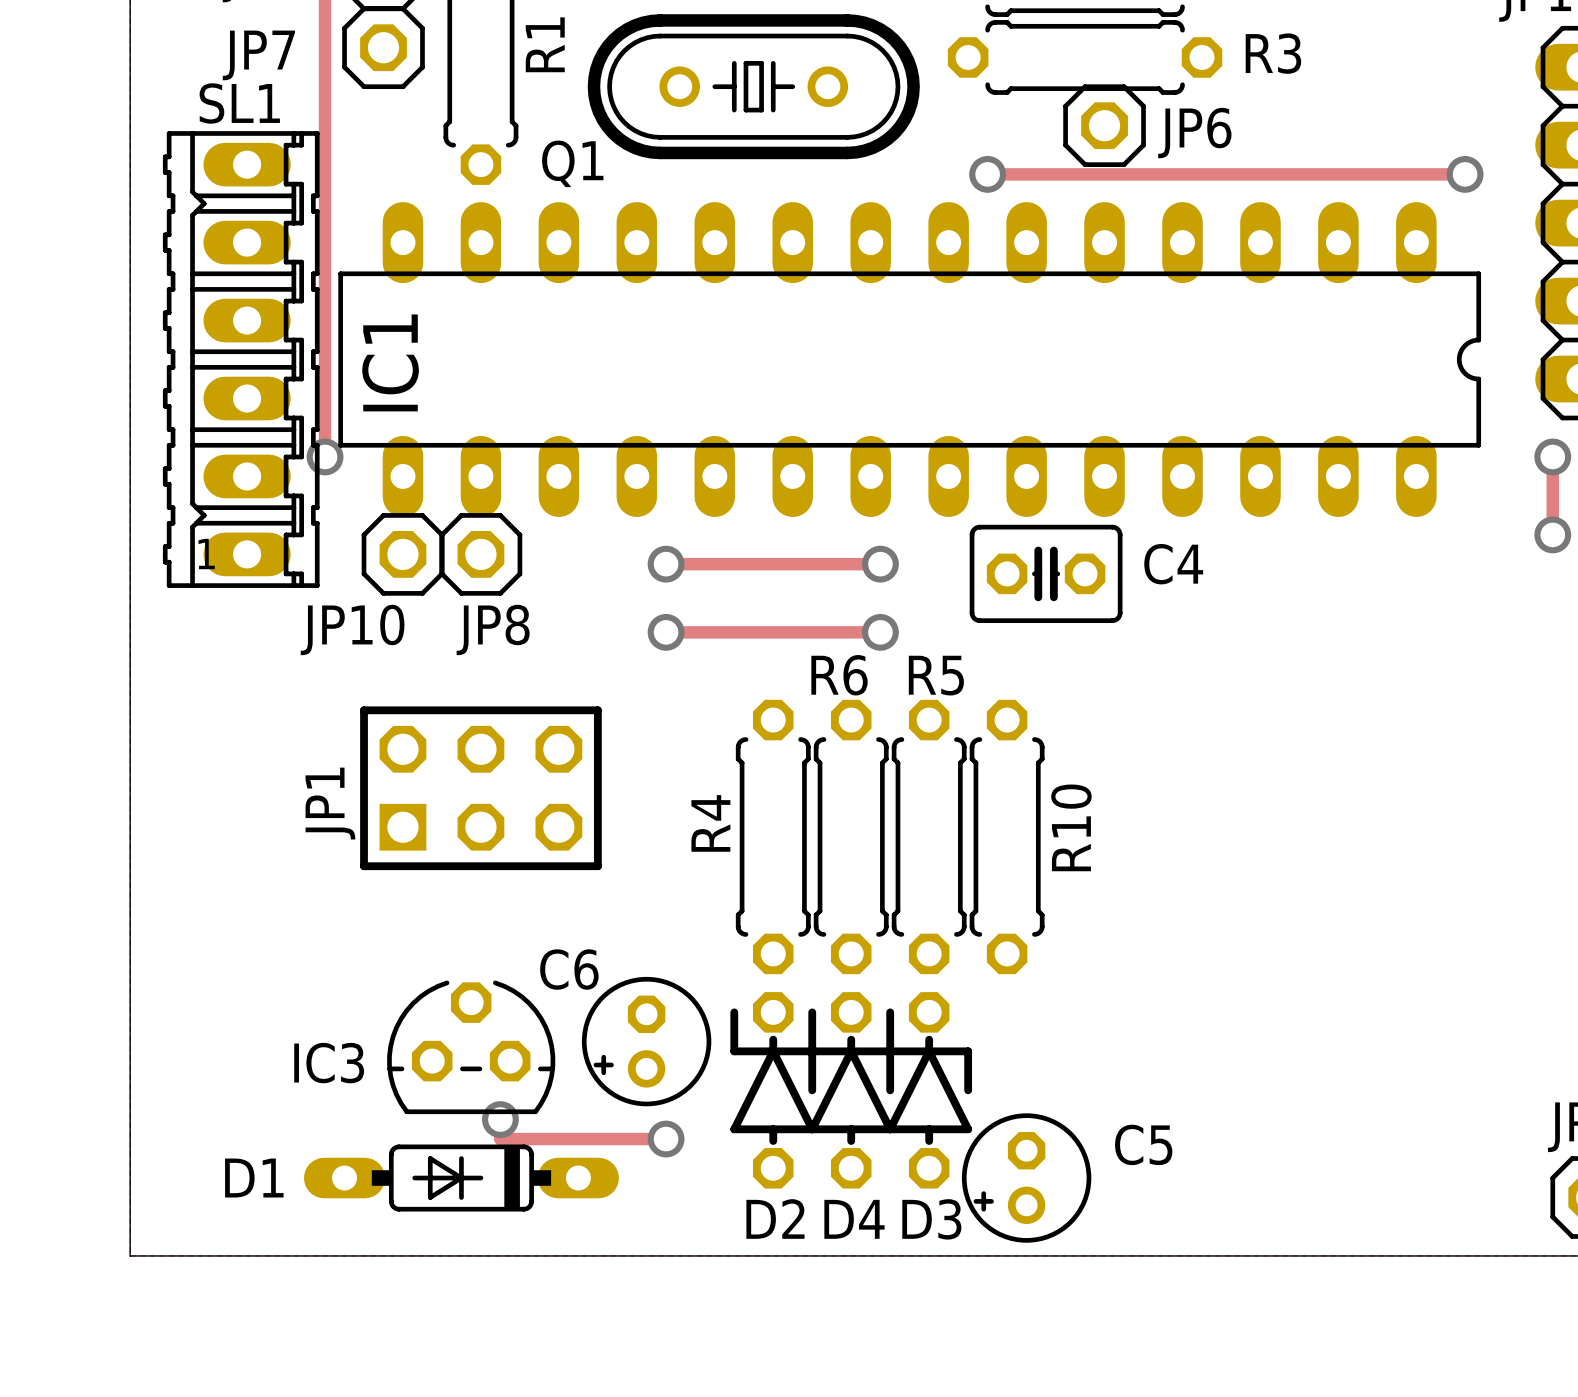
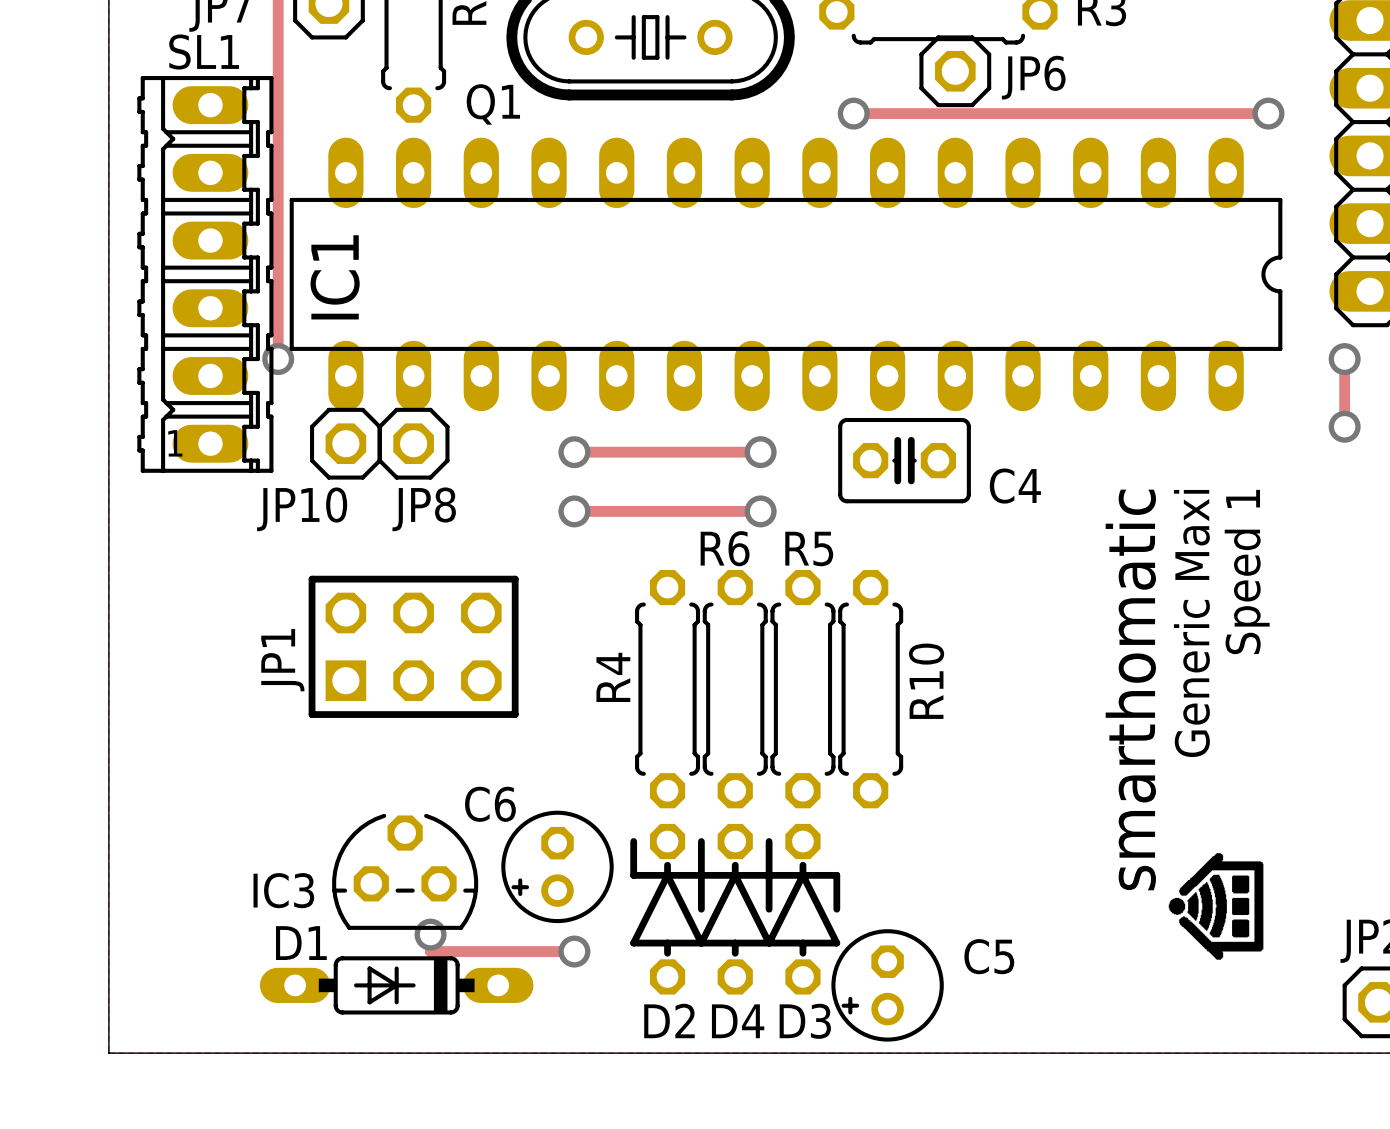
C4 name position: C4 (1173, 564) -> C4 (1015, 486)
text: none -> Speed 1 (1247, 572)
text: none -> Generic Maxi (1191, 623)
text: none -> smarthomatic (1130, 689)
drawing: none -> [1168, 853, 1264, 960]
IC3 name position: IC3 (329, 1063) -> IC3 (283, 890)
D1 name position: D1 (254, 1178) -> D1 (301, 943)

